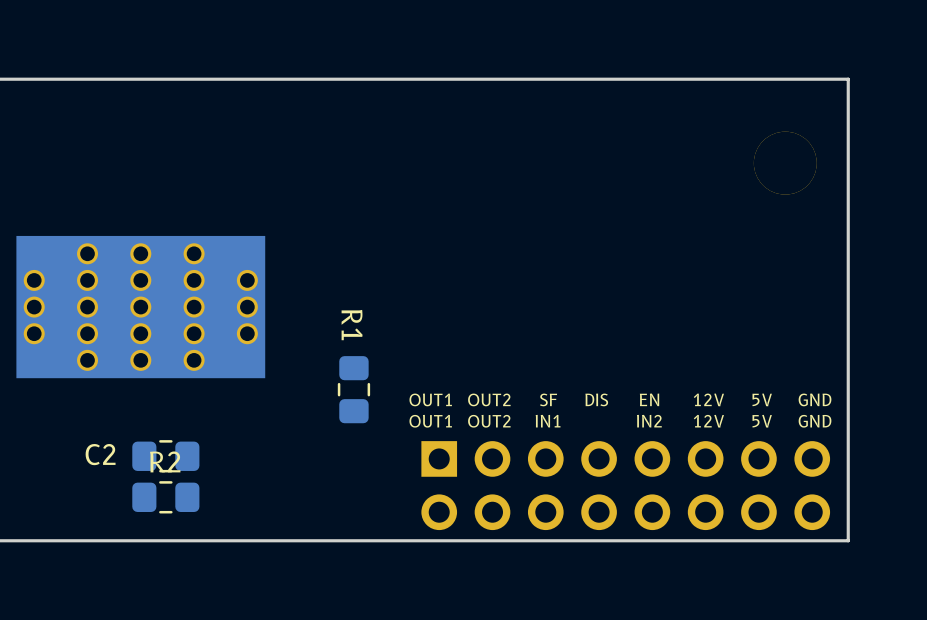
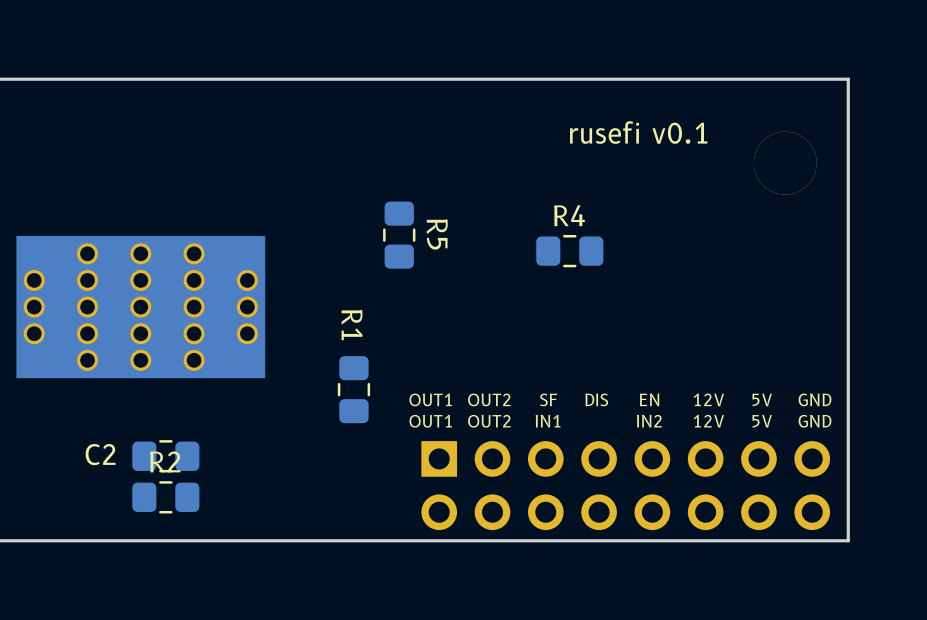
text: none -> rusefi v0.1 (638, 132)
R5: none -> (399, 235)
R4: none -> (569, 251)

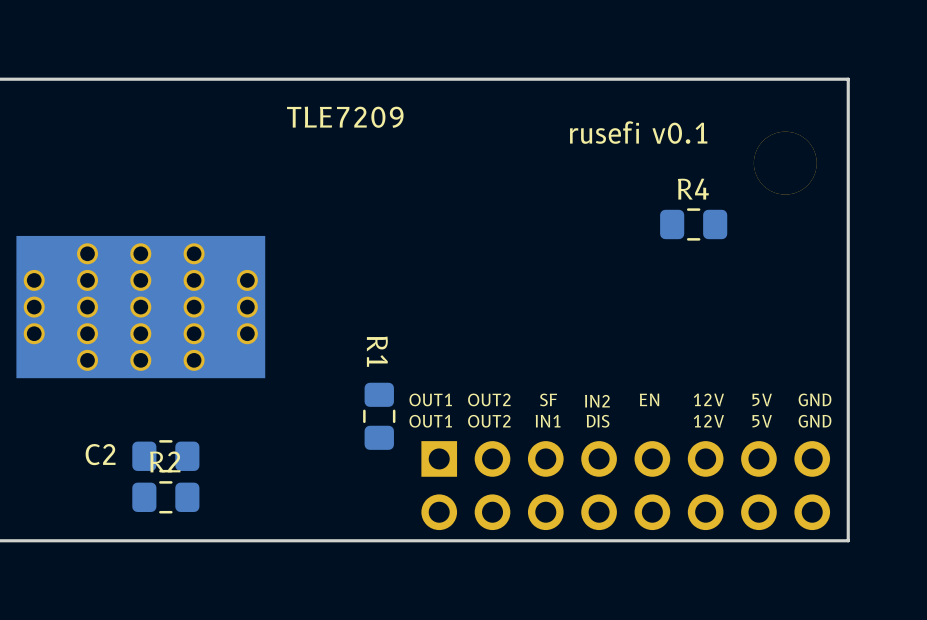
text: none -> TLE7209 (345, 117)
R5: (399, 235) -> none
R4 position: (569, 251) -> (693, 224)
R1 position: (353, 389) -> (379, 416)
text: DIS (596, 399) -> IN2 (597, 401)
text: none -> DIS (598, 421)
text: IN2 (649, 421) -> none

